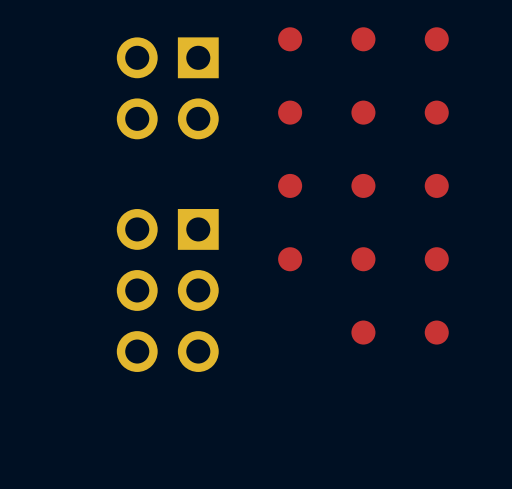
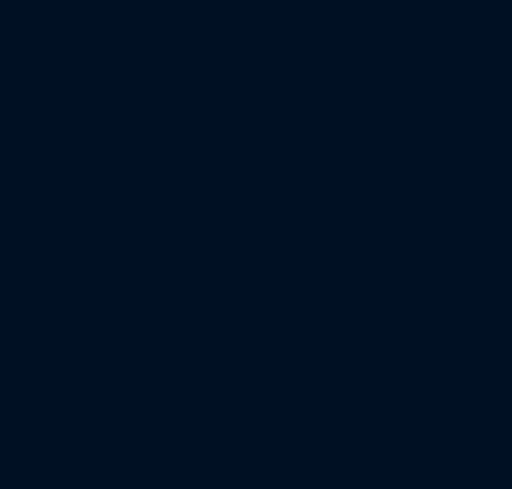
part: (290, 39) -> none
part: (363, 39) -> none
part: (436, 39) -> none
part: (167, 88) -> none
part: (290, 112) -> none
part: (363, 112) -> none
part: (436, 112) -> none
part: (290, 185) -> none
part: (363, 185) -> none
part: (436, 185) -> none
part: (290, 259) -> none
part: (363, 259) -> none
part: (436, 259) -> none
part: (167, 290) -> none
part: (363, 332) -> none
part: (436, 332) -> none

